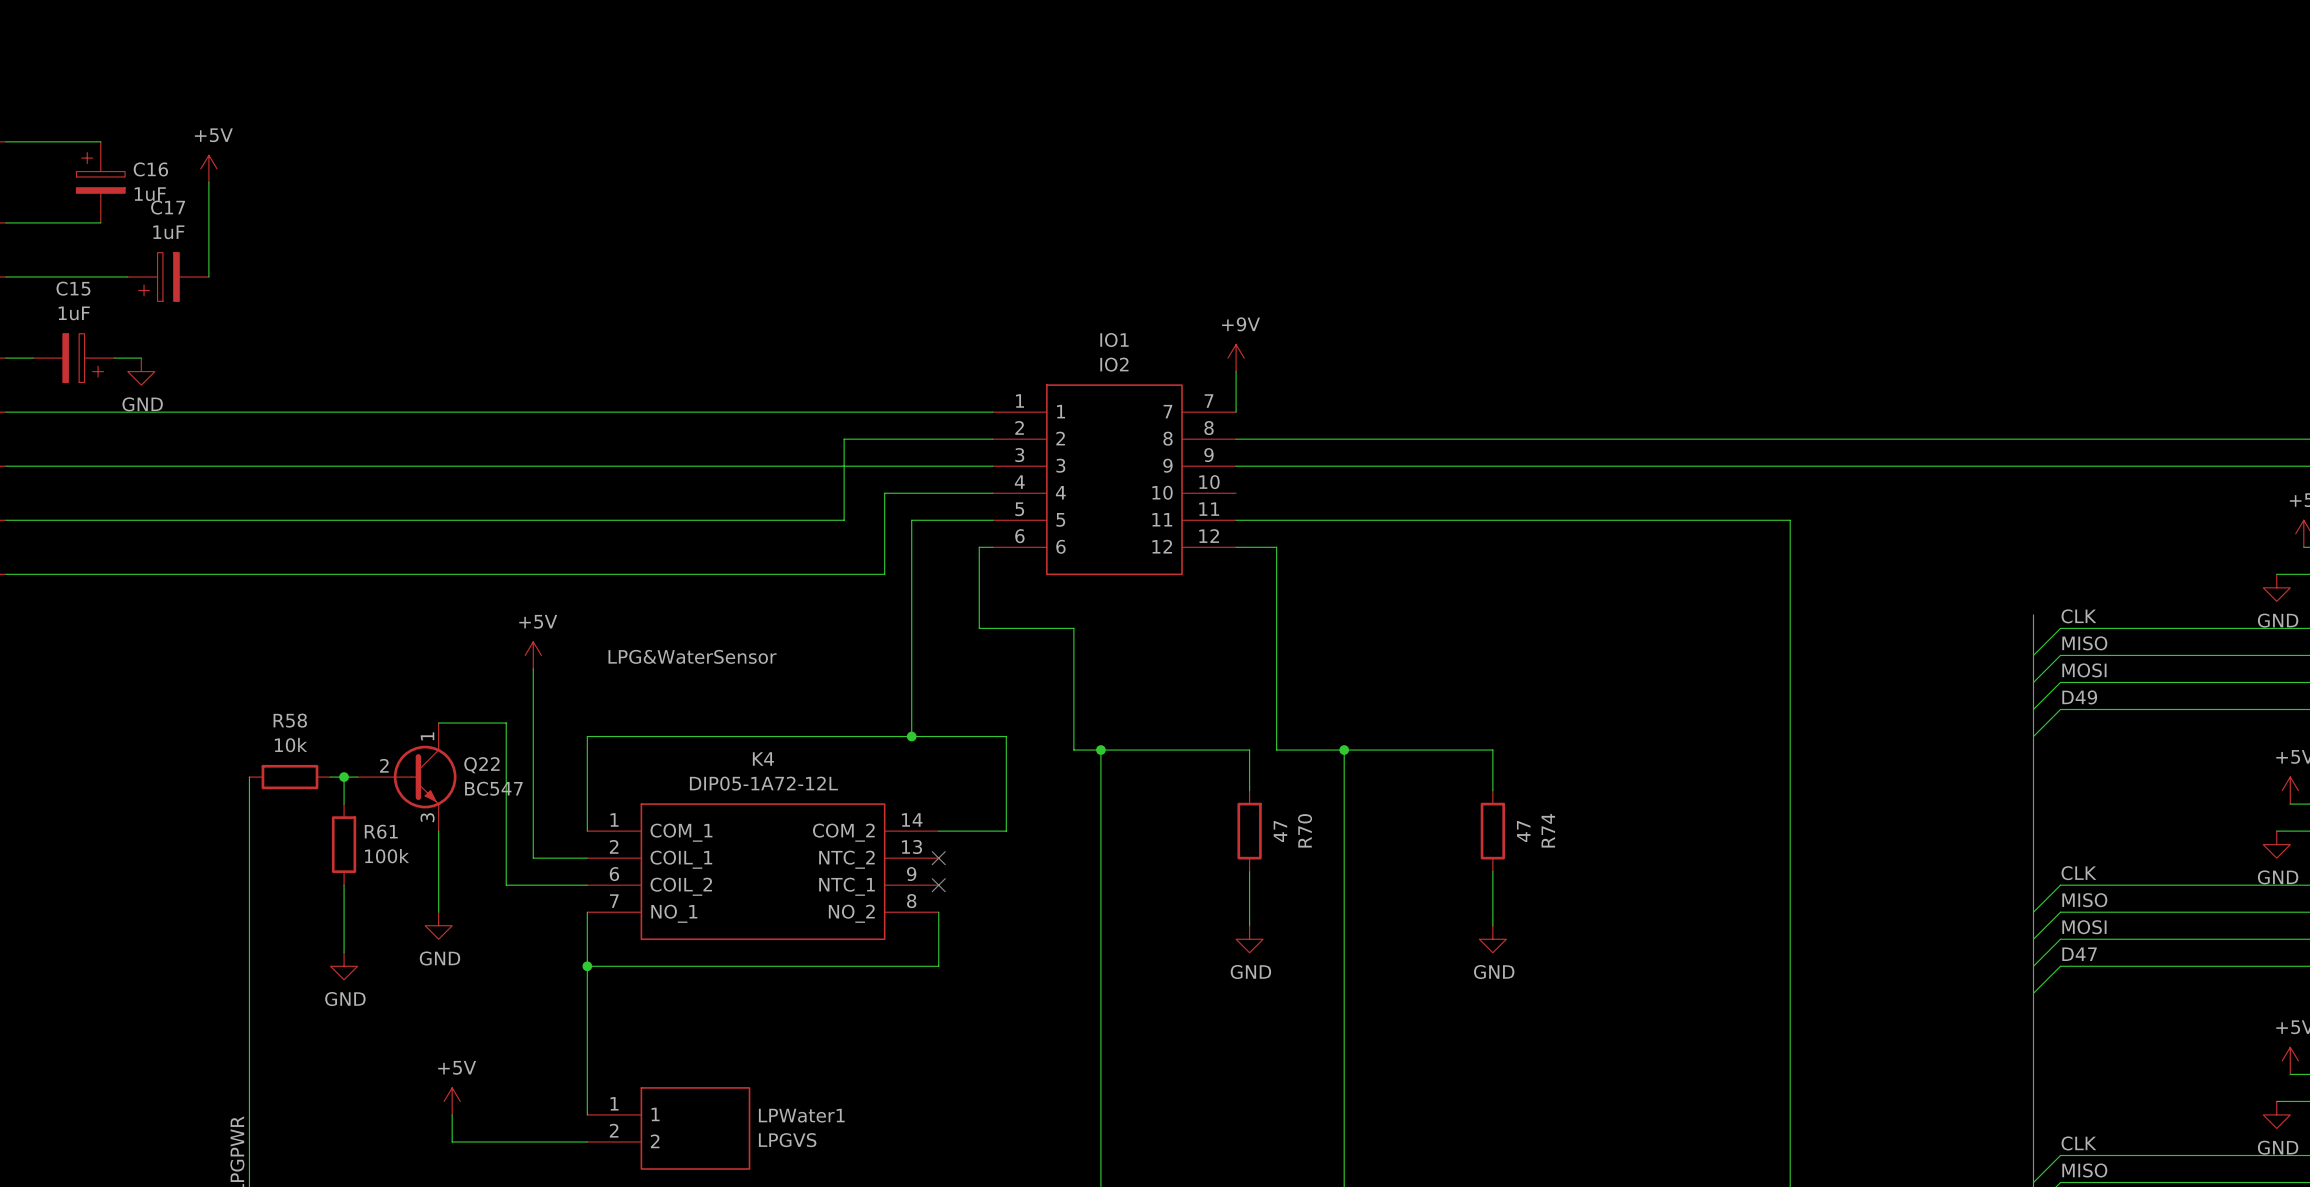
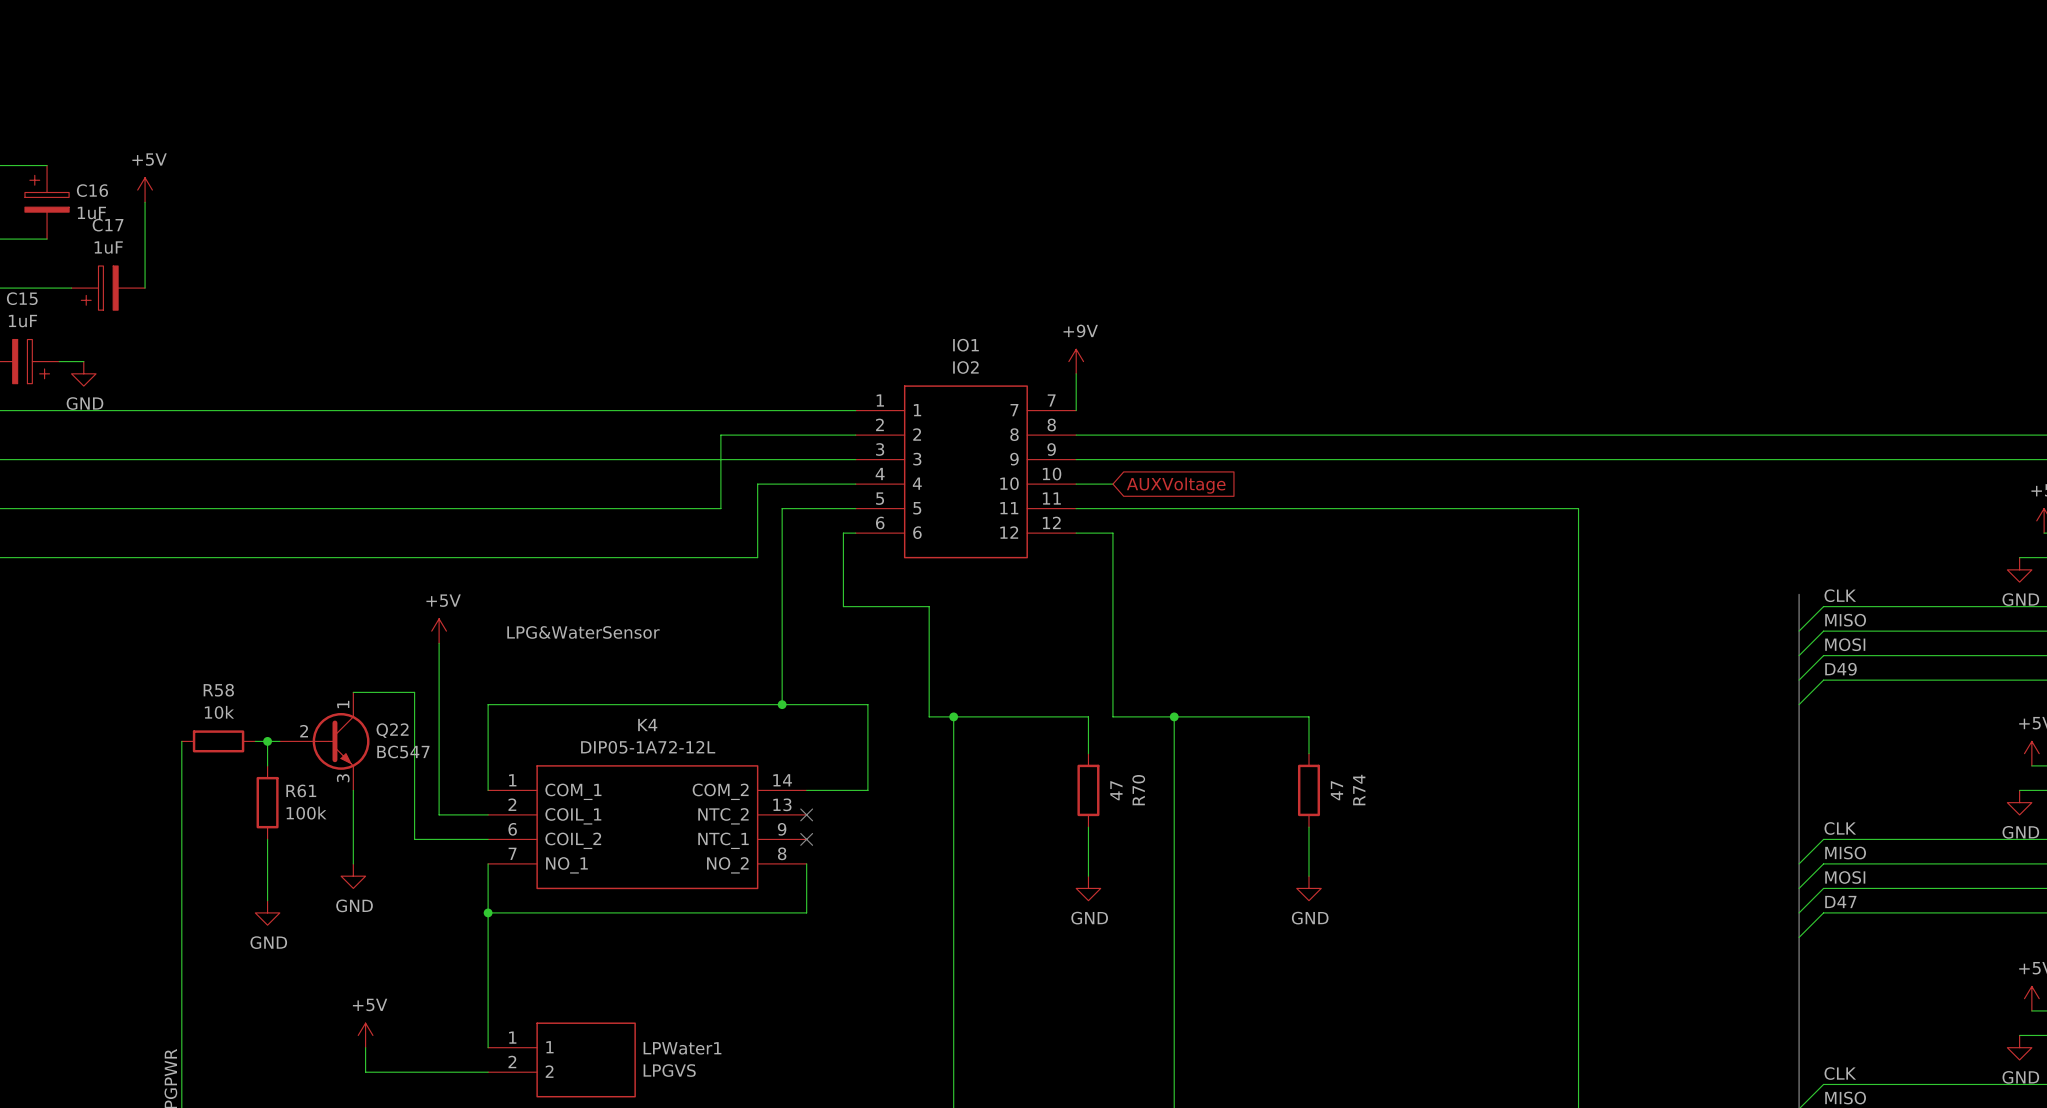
wire: none -> (1076, 484) (1112, 484)
global label: none -> AUXVoltage (1176, 485)

